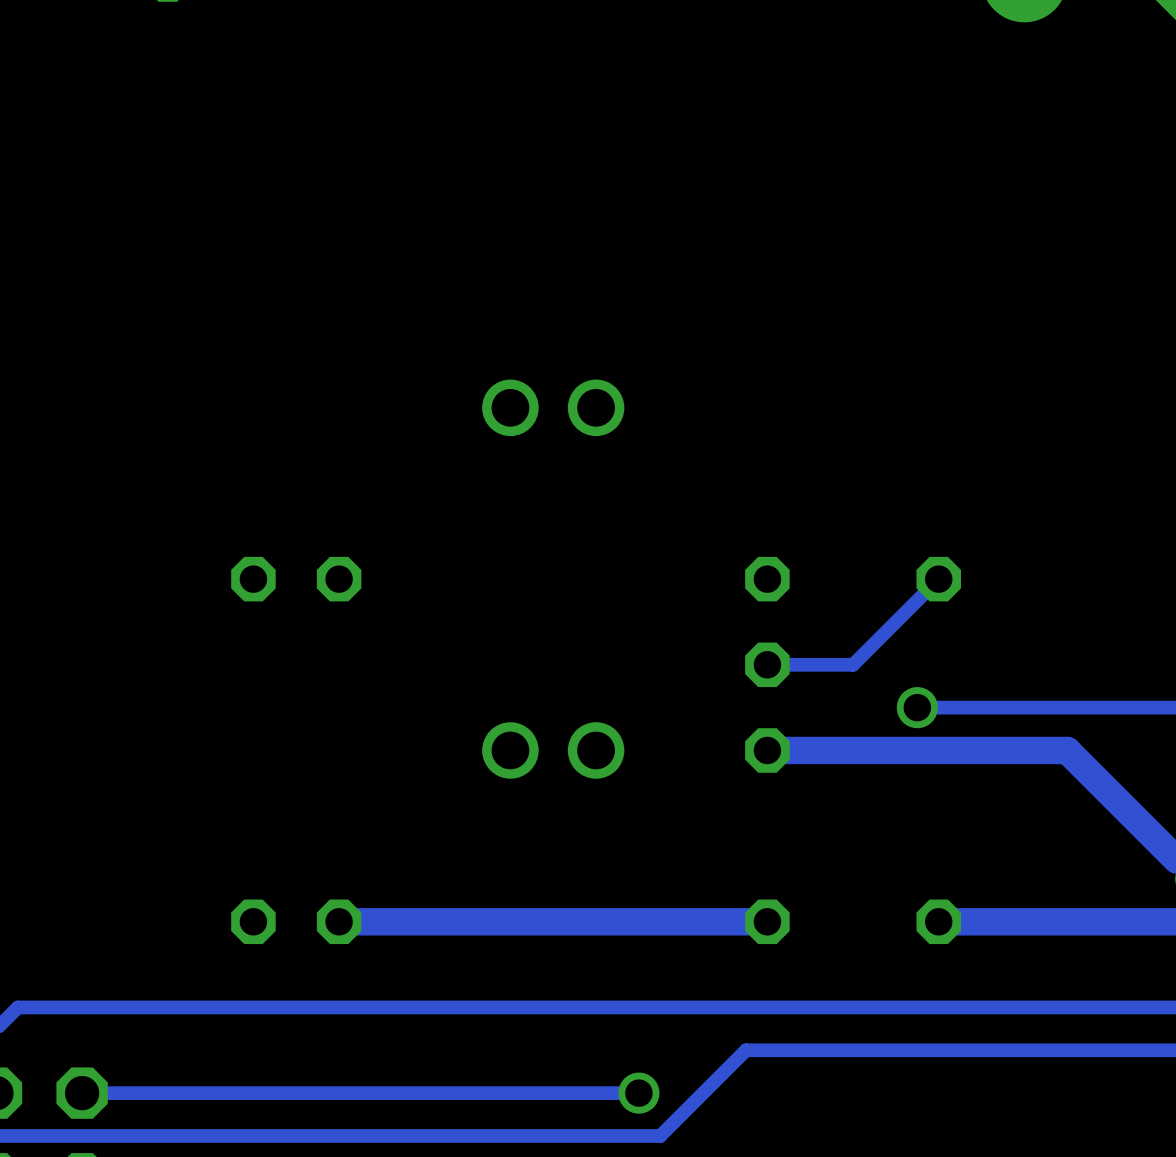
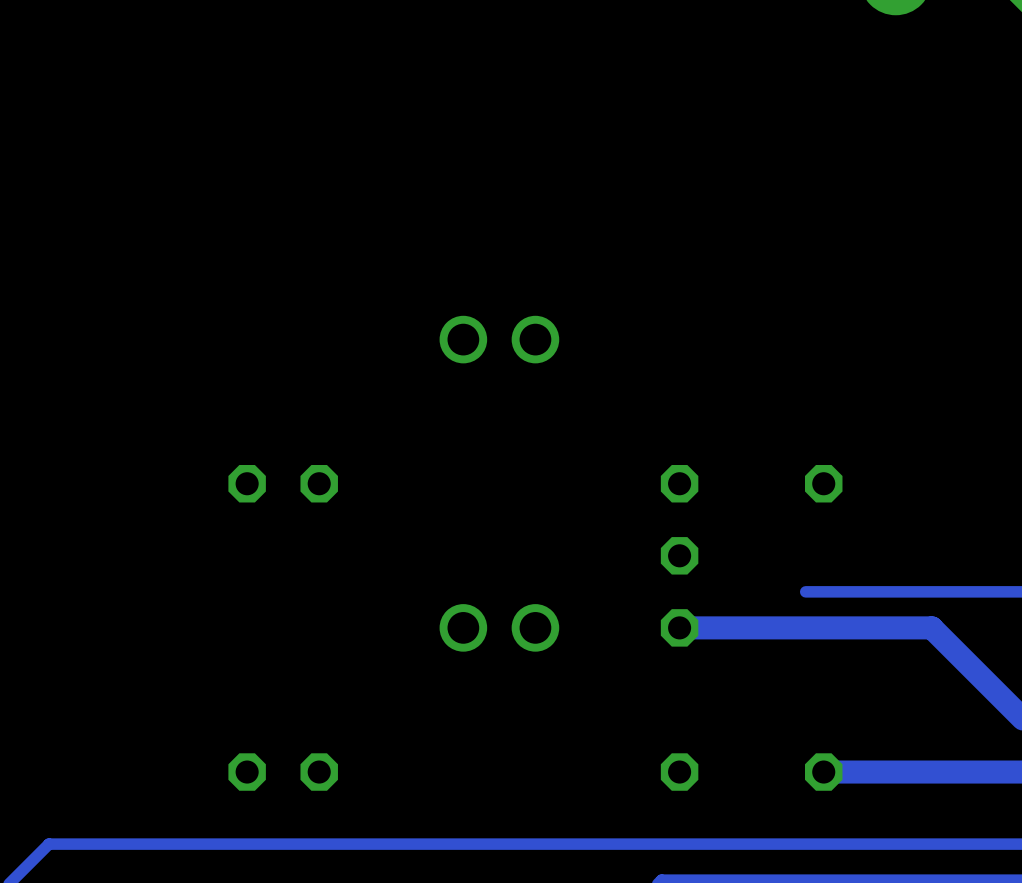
track: (938, 579) (853, 664) (767, 664) -> none
via: (917, 707) -> none
track: (767, 921) (339, 921) -> none

